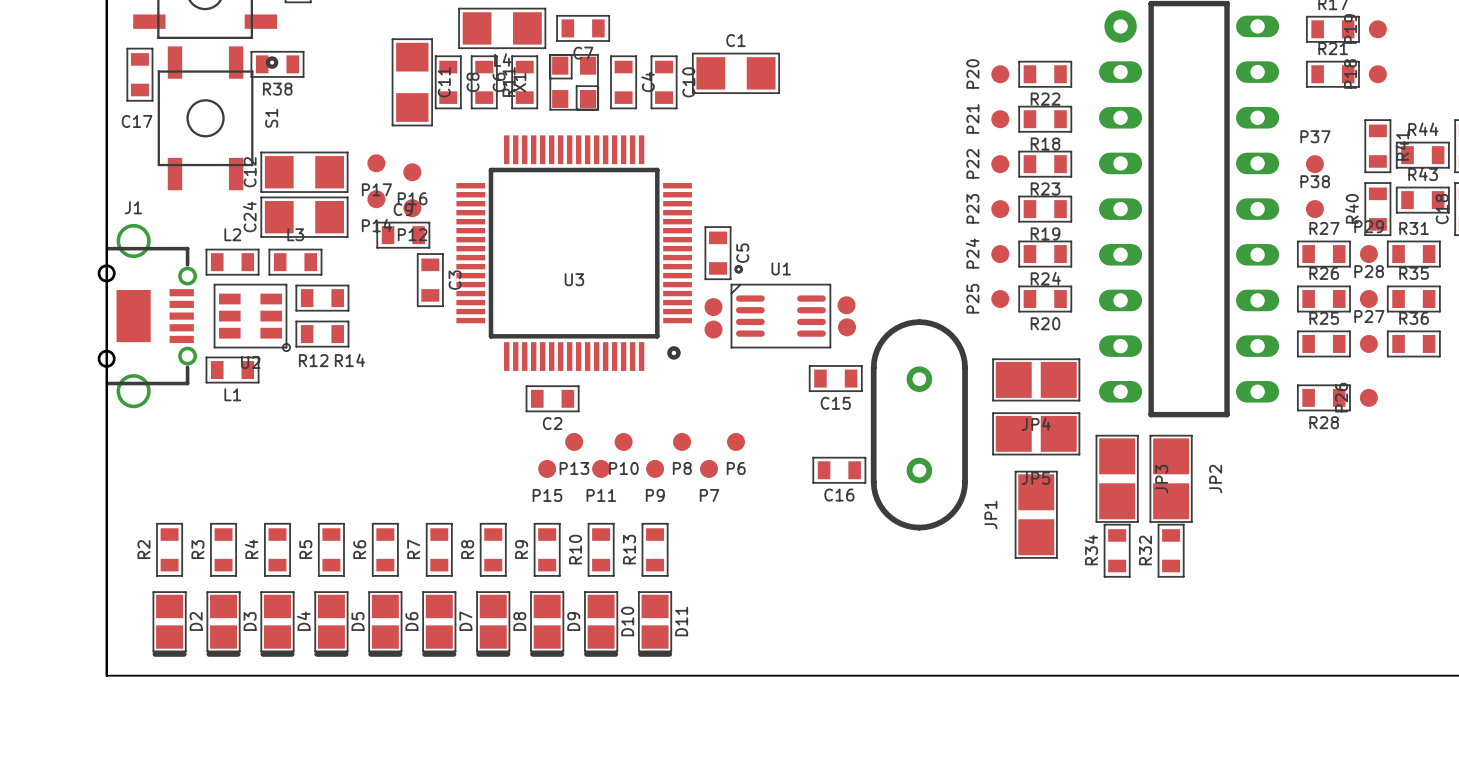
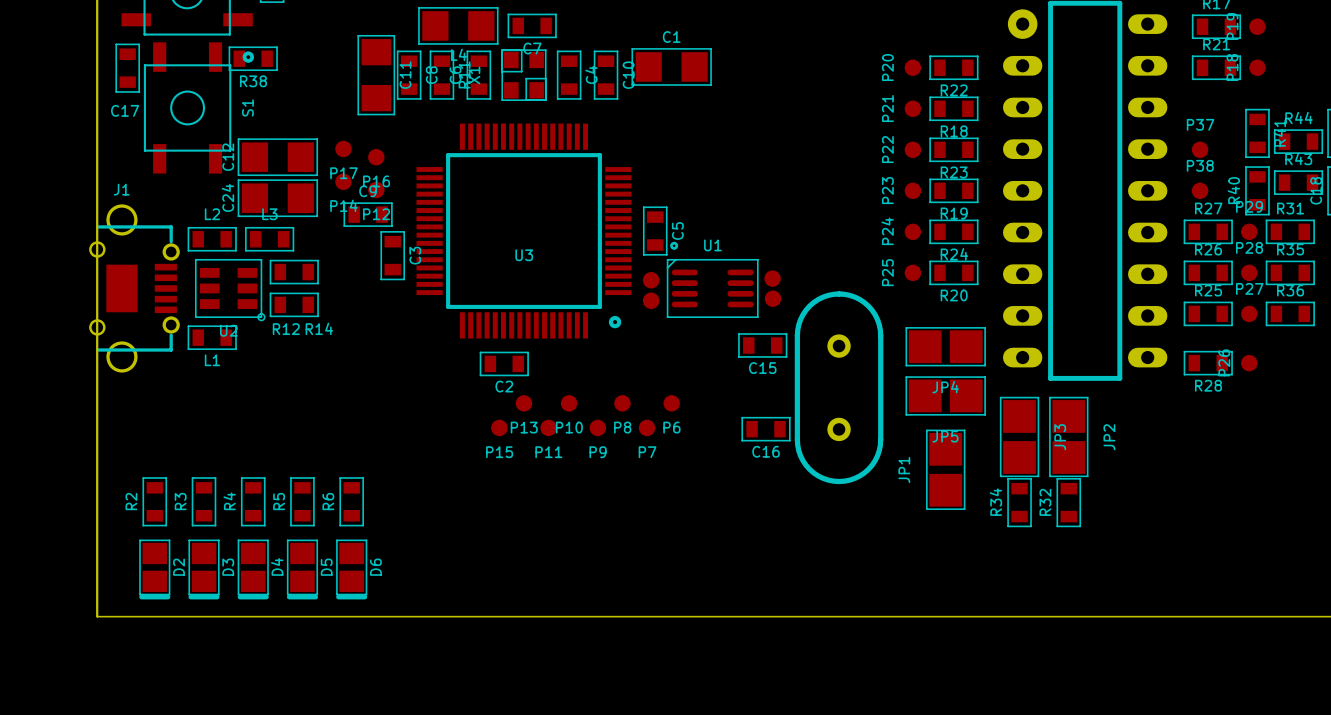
R7: (439, 549) -> none
R8: (493, 549) -> none
R9: (547, 549) -> none
R10: (601, 549) -> none
R13: (655, 549) -> none
D7: (439, 624) -> none
D8: (493, 624) -> none
D9: (547, 624) -> none
D10: (601, 624) -> none
D11: (655, 624) -> none

